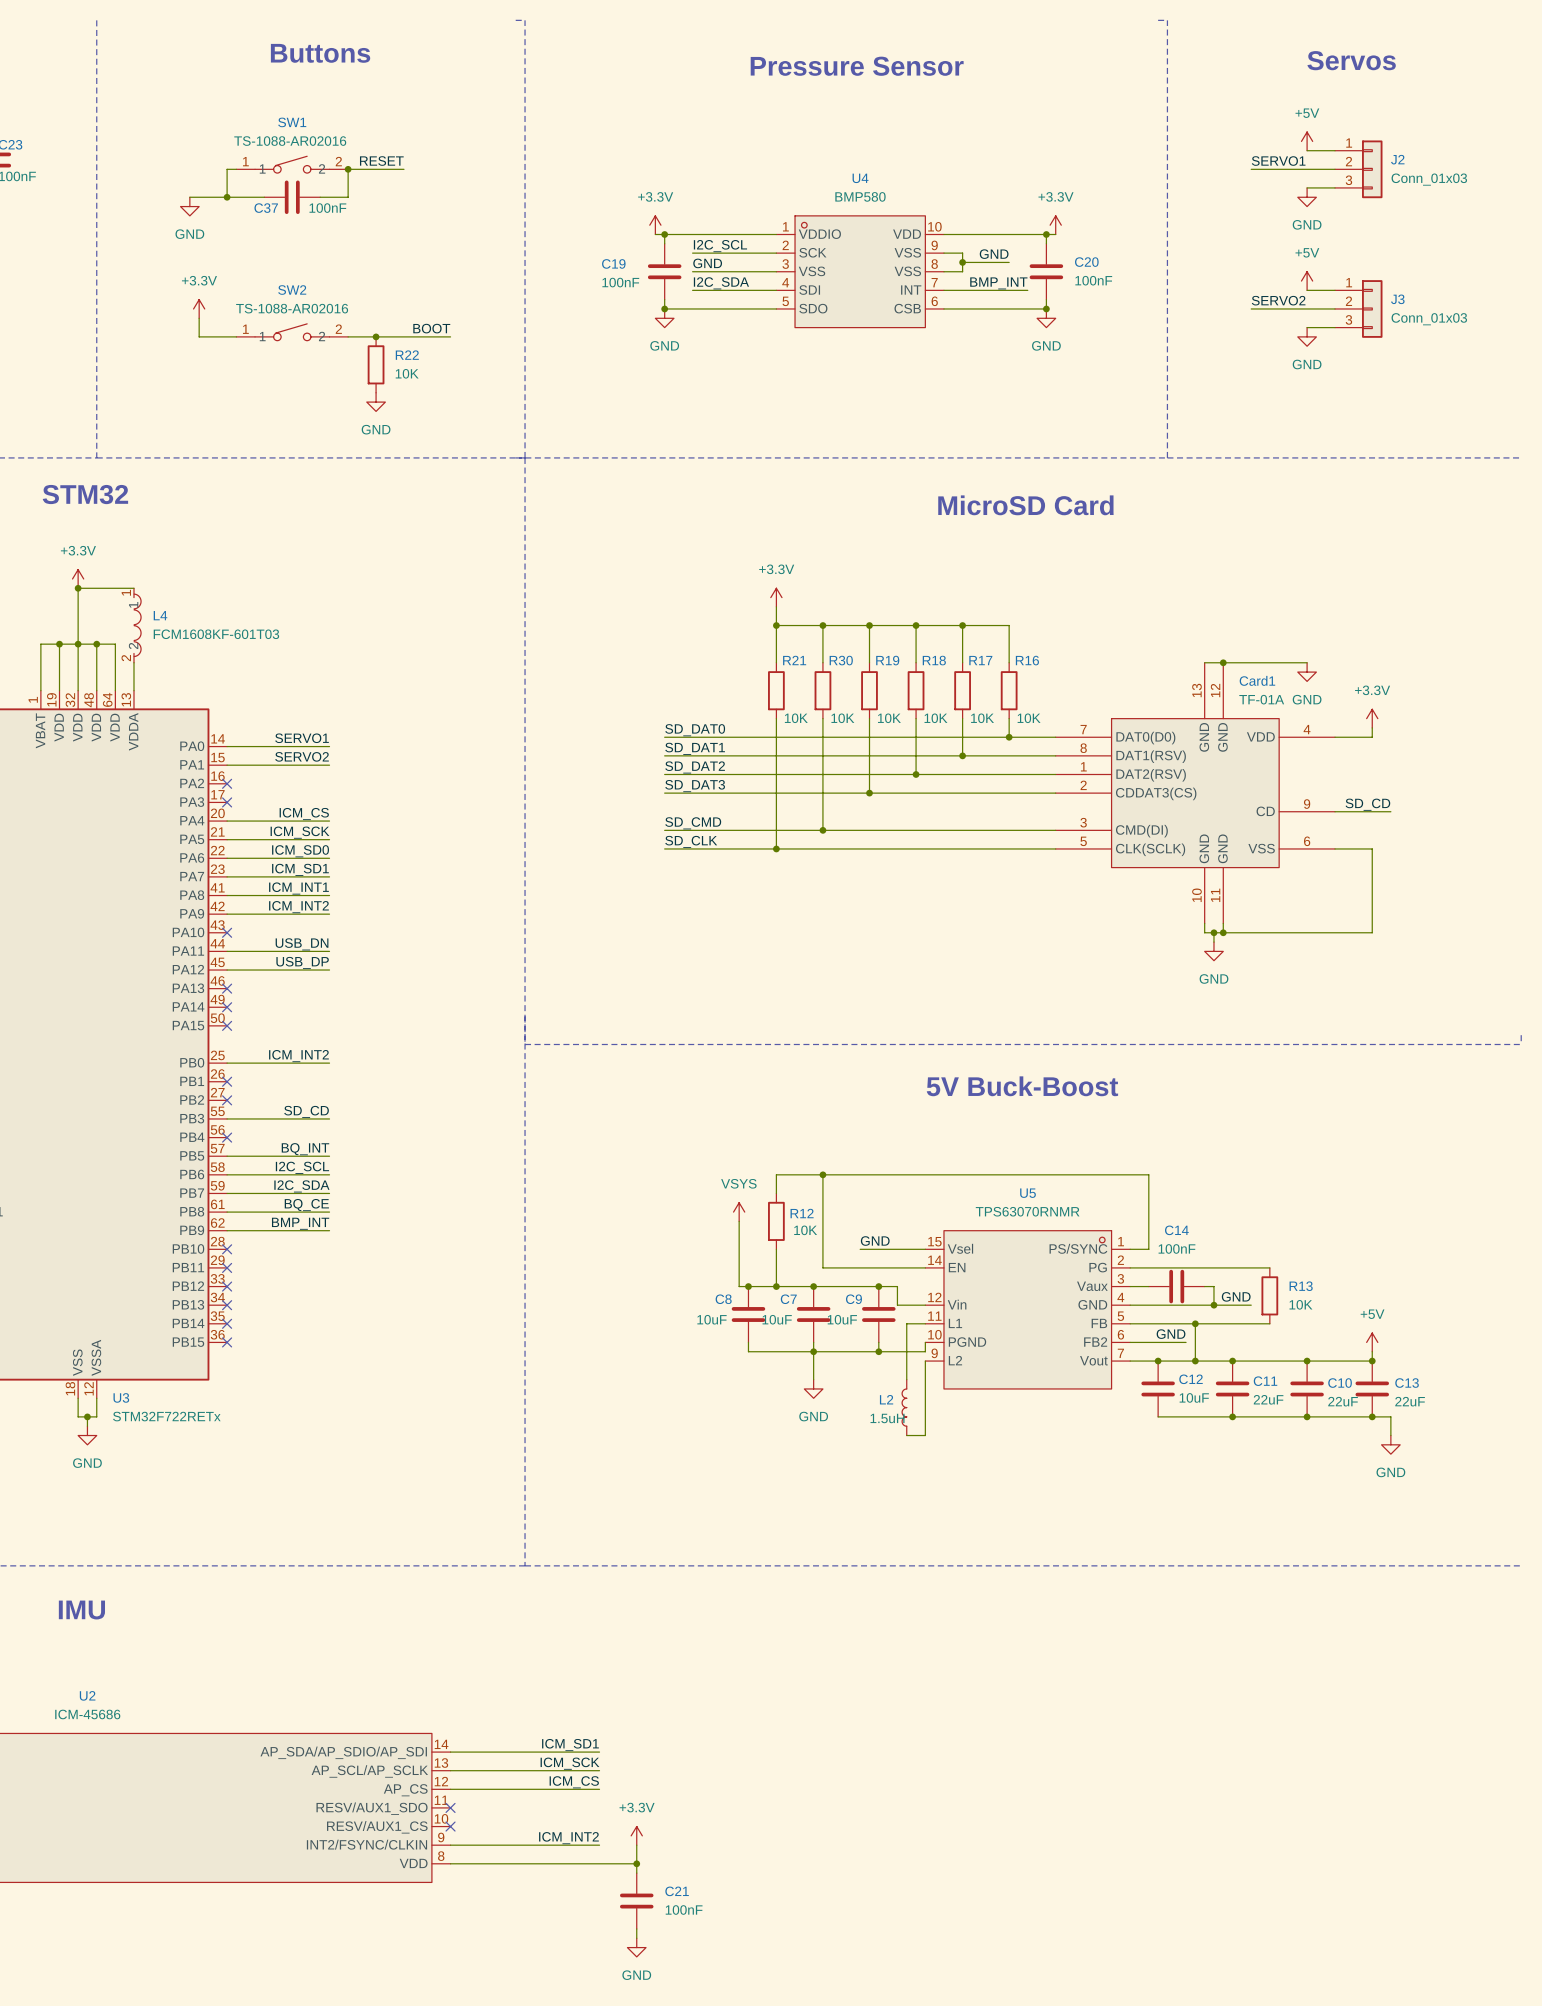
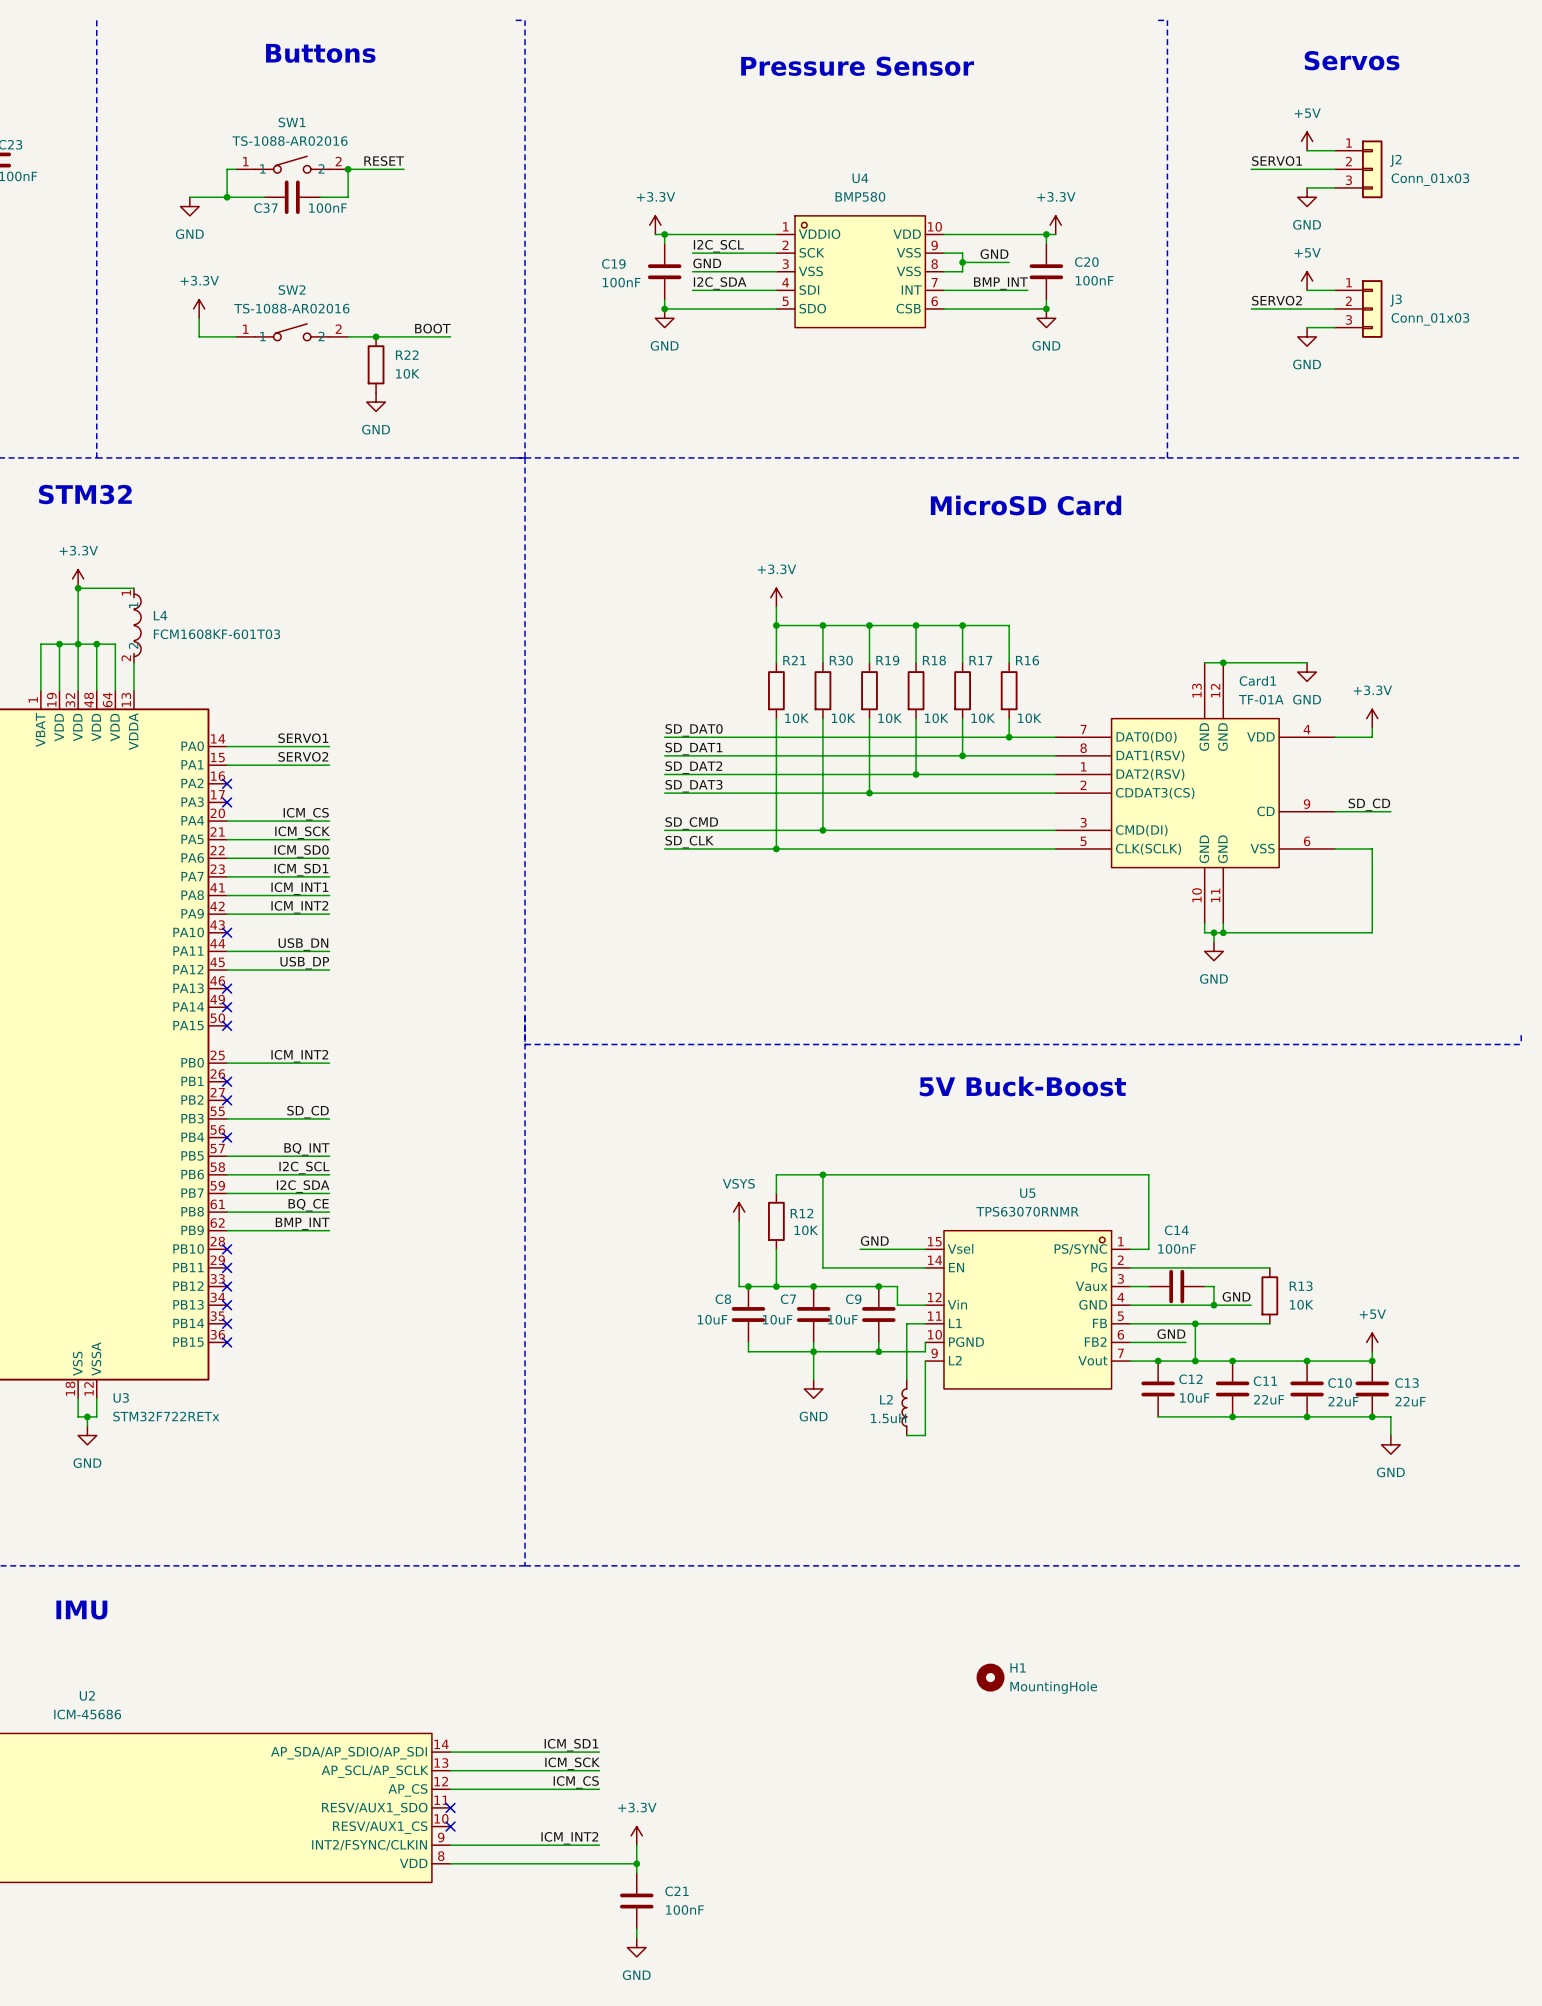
H1: none -> MountingHole (990, 1677)

